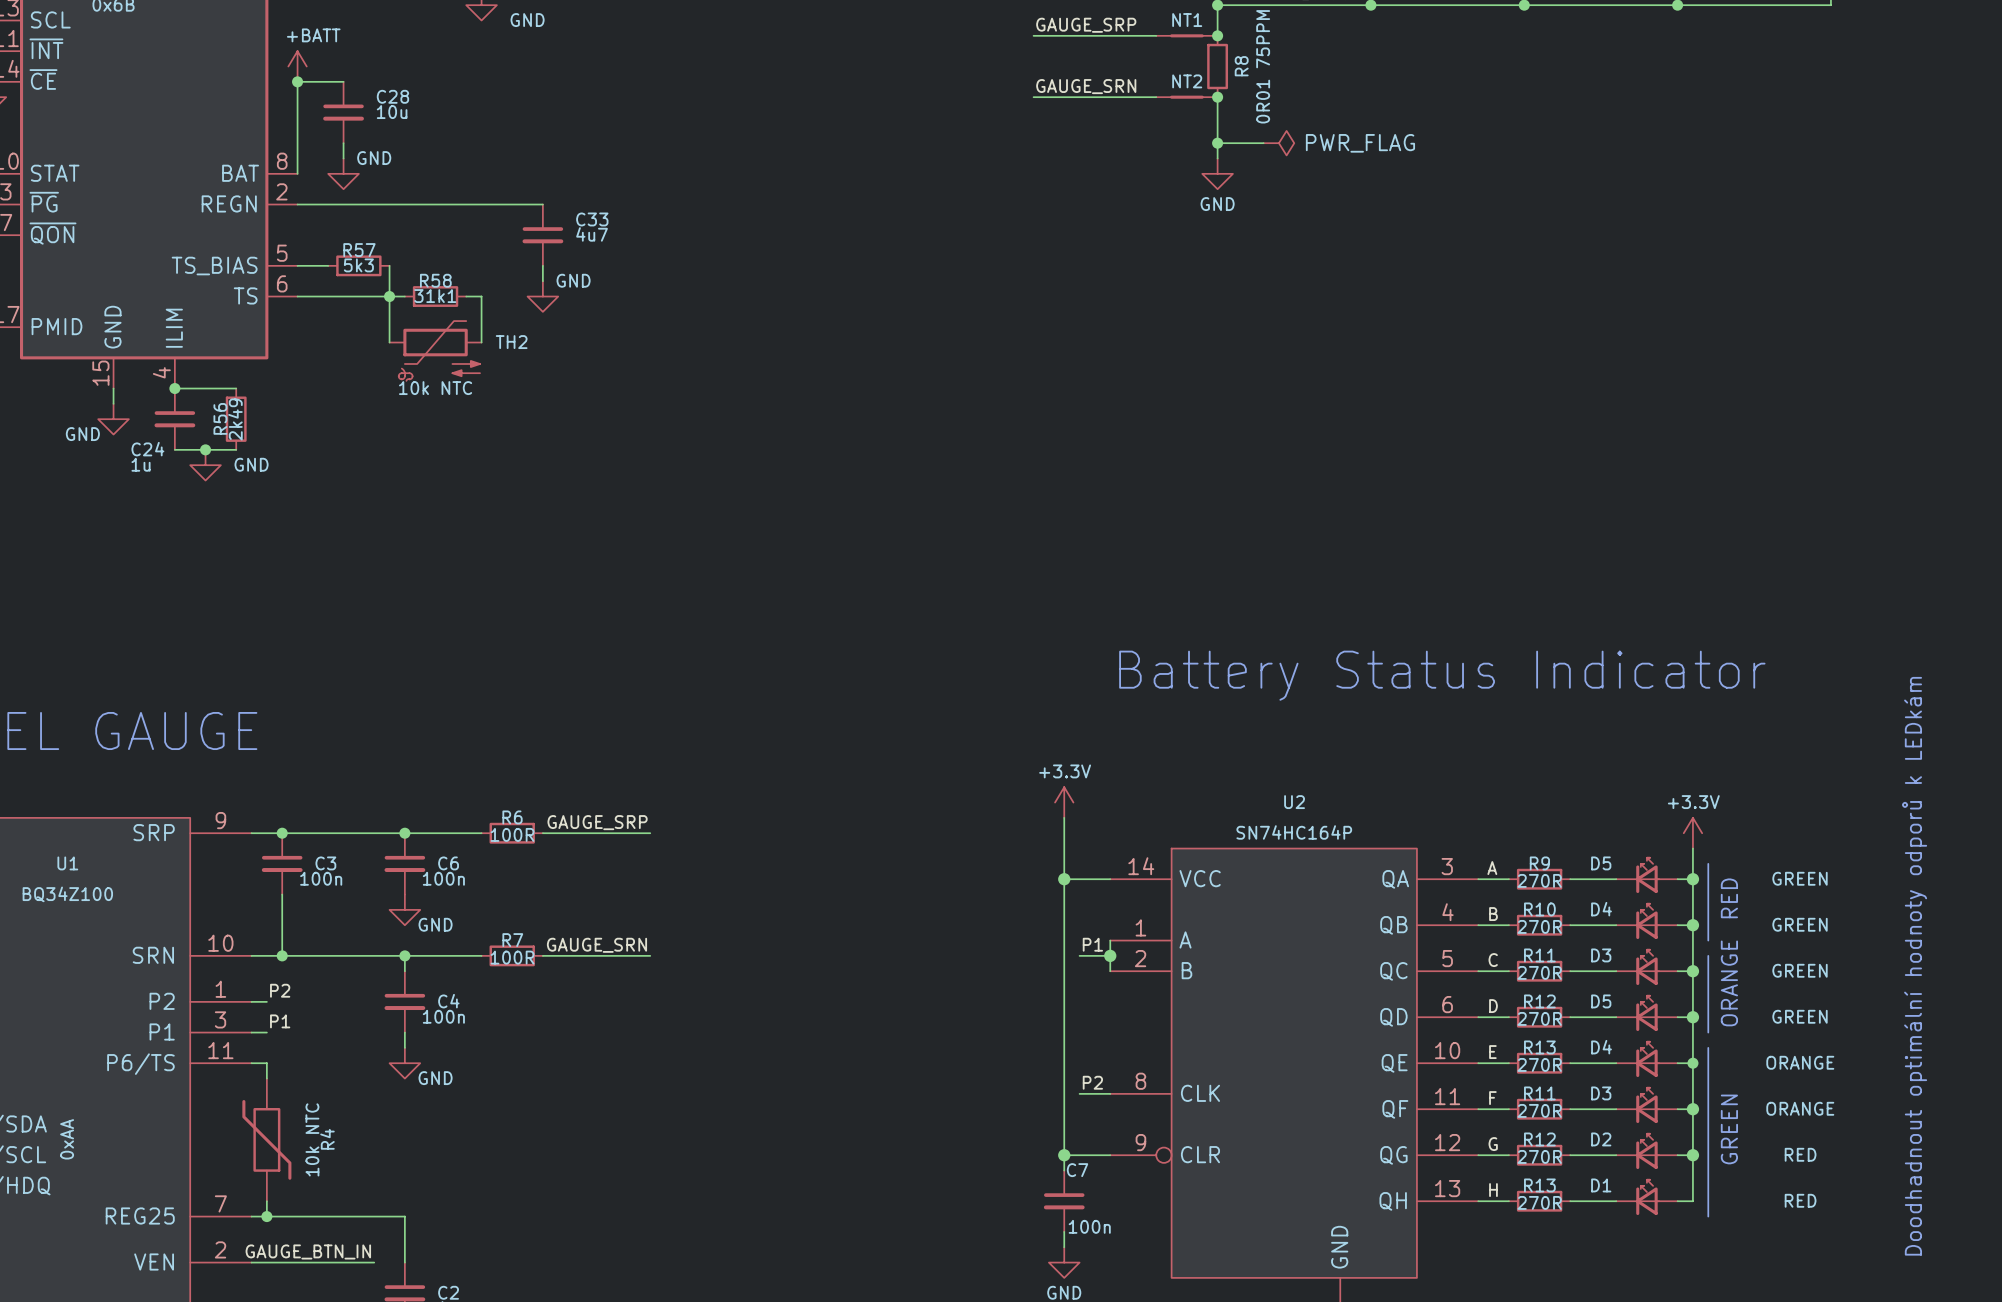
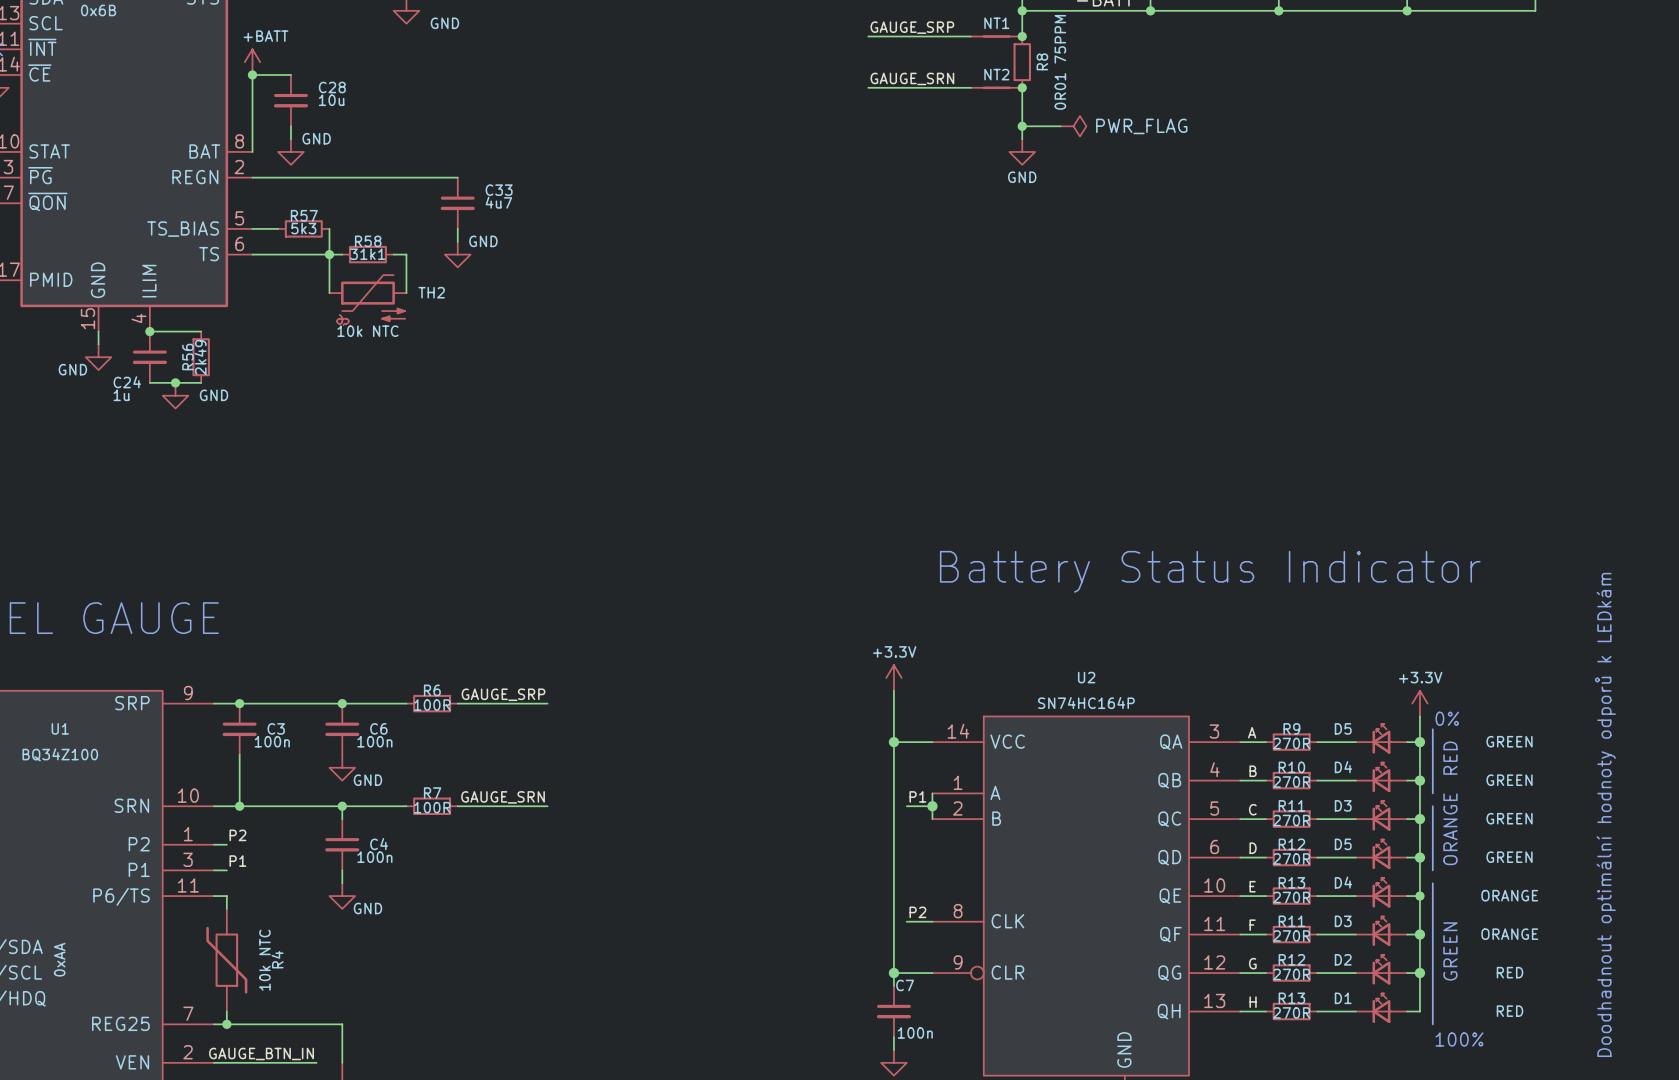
text: none -> 0% (1447, 718)
text: none -> 100% (1459, 1039)

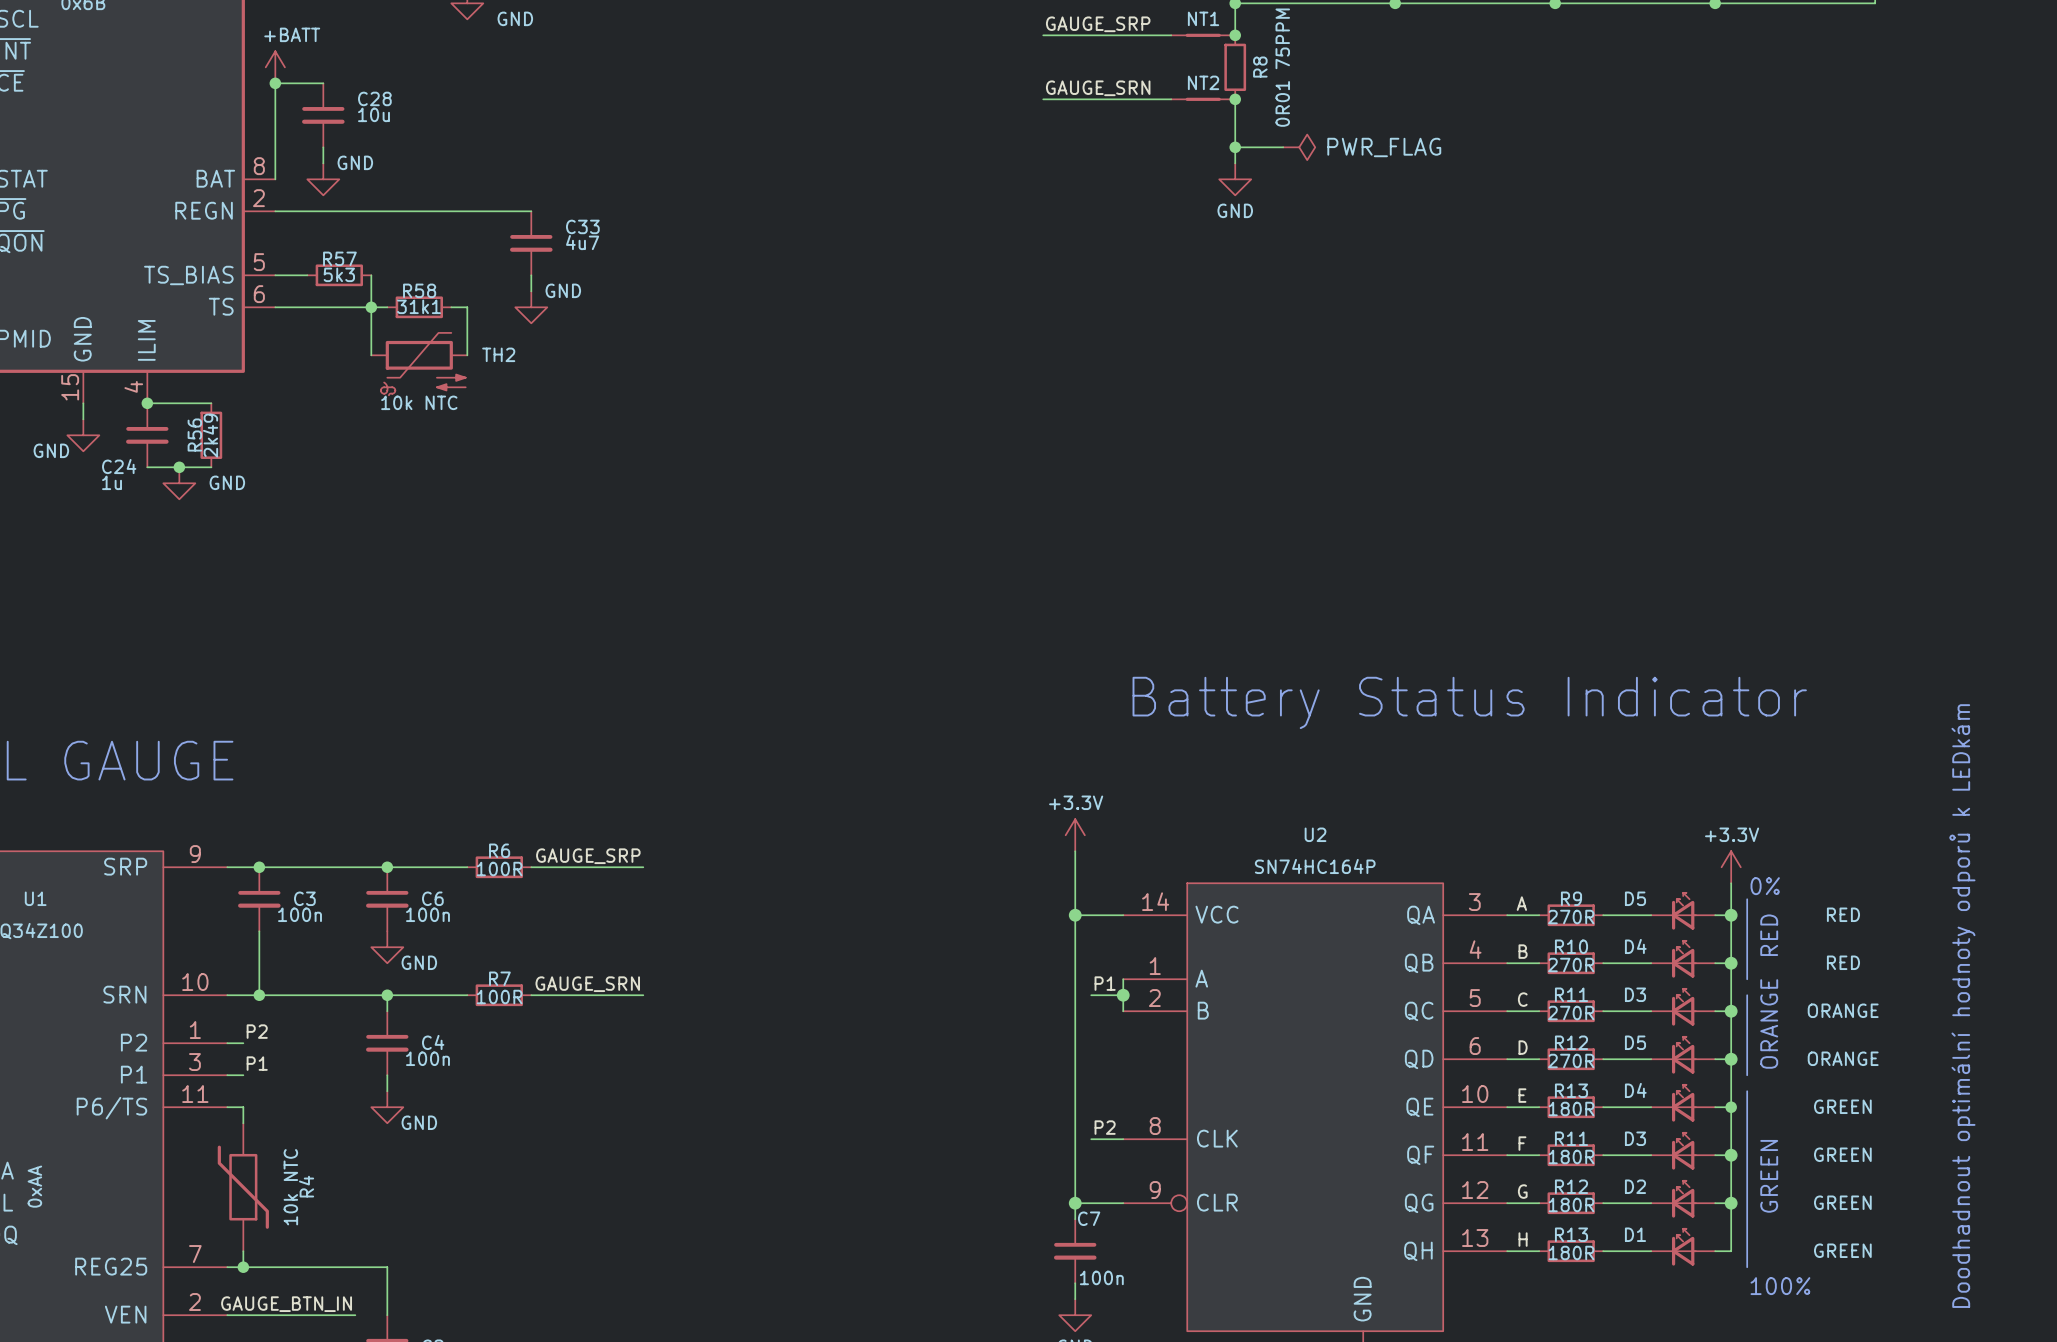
D5 value: GREEN (1509, 741) -> RED (1843, 914)
D4 value: GREEN (1509, 780) -> RED (1843, 962)
D3 value: GREEN (1509, 818) -> ORANGE (1843, 1010)
D5 value: GREEN (1509, 857) -> ORANGE (1843, 1058)
D4 value: ORANGE (1509, 895) -> GREEN (1842, 1106)
R13 value: 270R (1291, 897) -> 180R (1571, 1109)
D3 value: ORANGE (1509, 934) -> GREEN (1842, 1154)
R11 value: 270R (1291, 935) -> 180R (1571, 1156)
D2 value: RED (1510, 972) -> GREEN (1842, 1202)
R12 value: 270R (1291, 974) -> 180R (1571, 1204)
D1 value: RED (1510, 1011) -> GREEN (1842, 1250)
R13 value: 270R (1291, 1012) -> 180R (1571, 1252)

